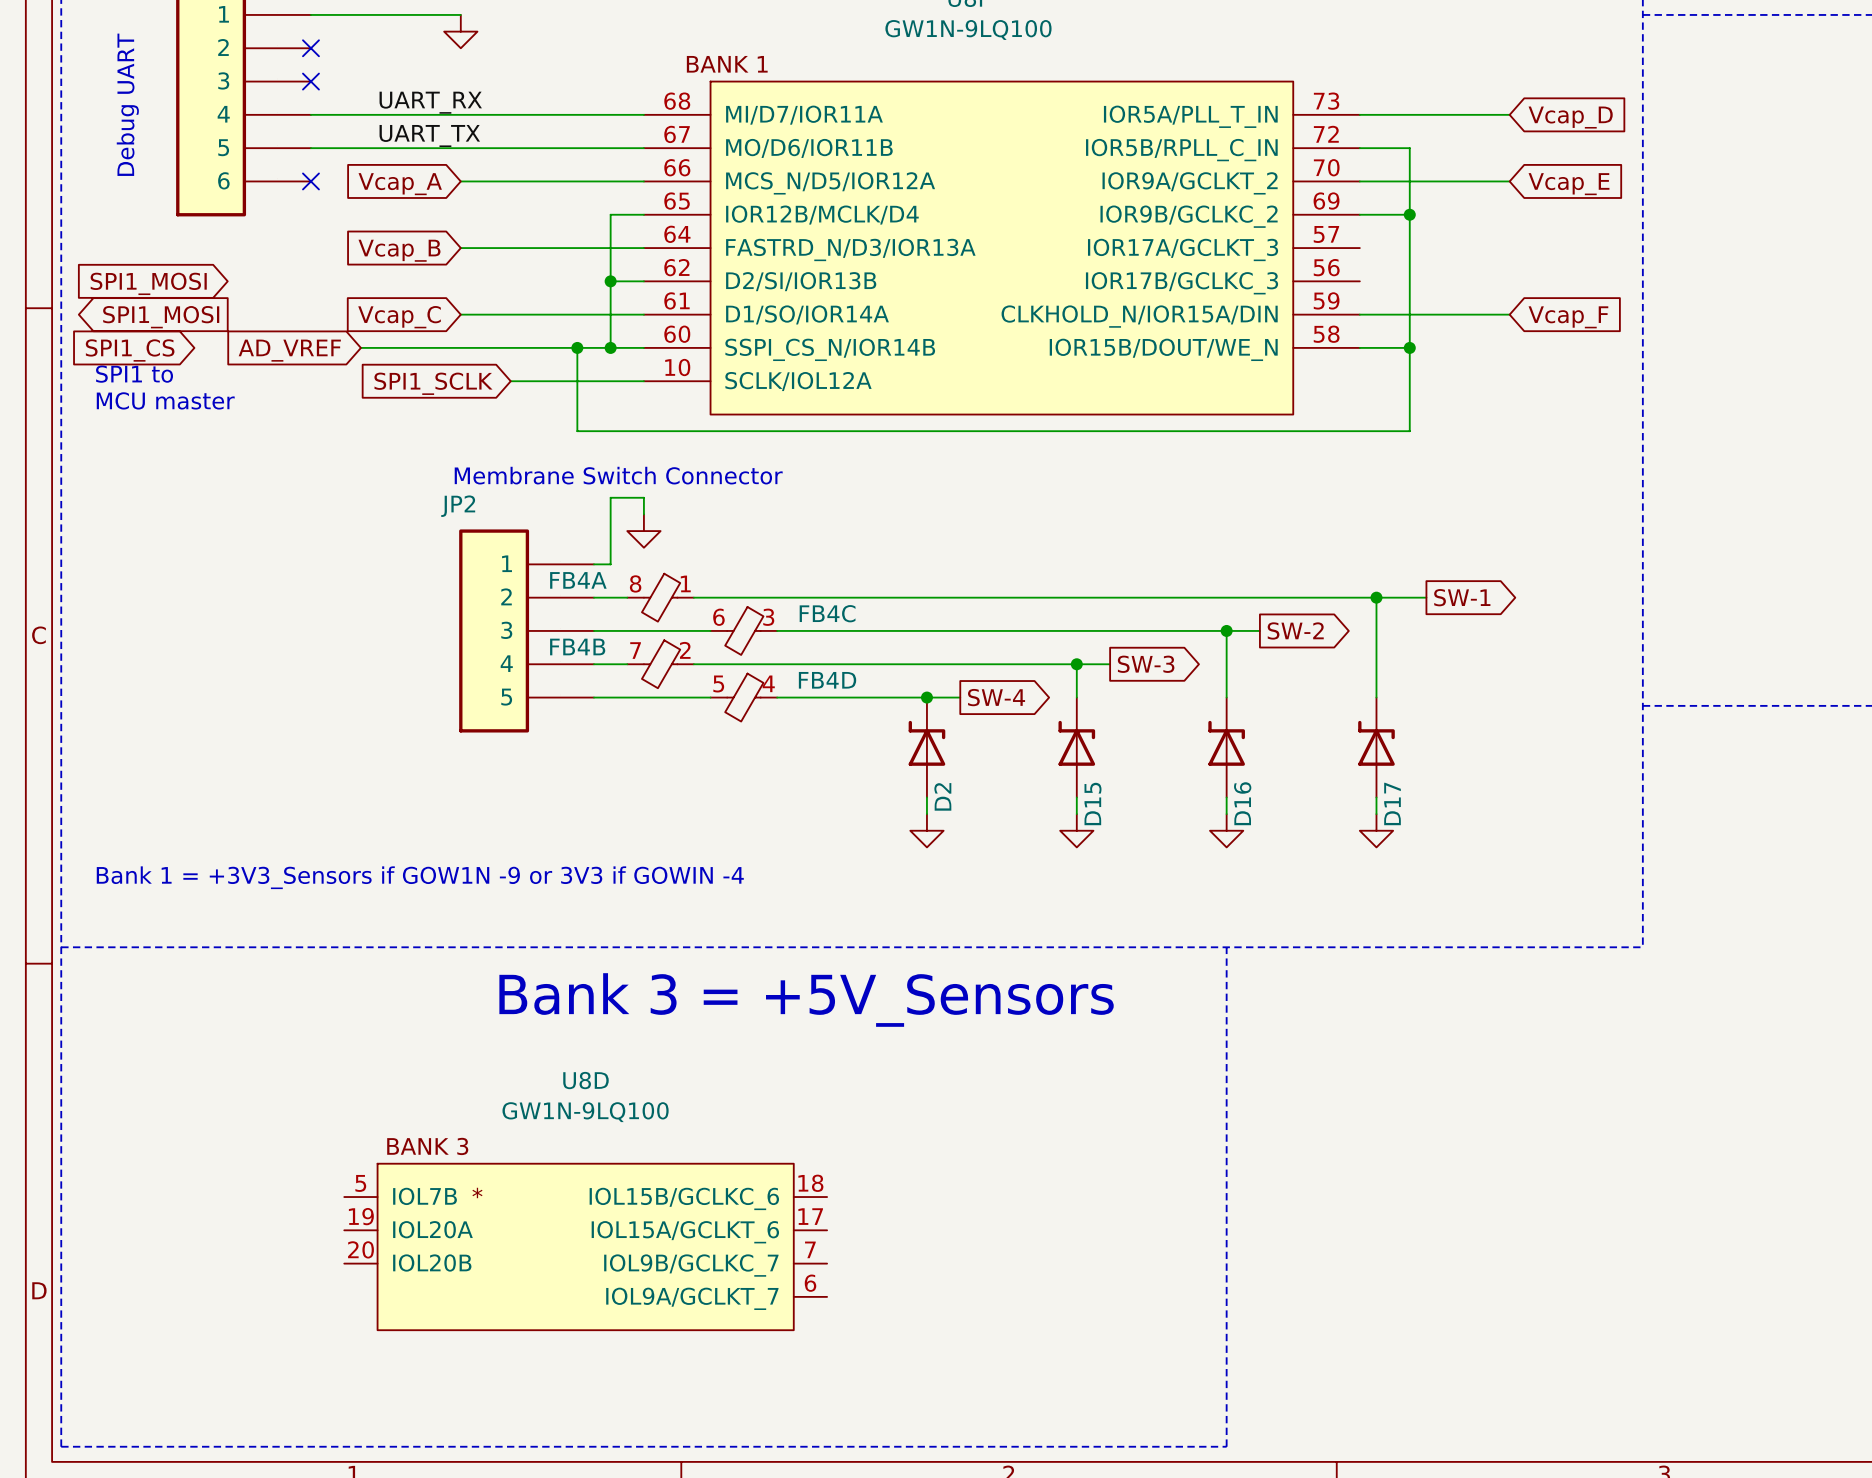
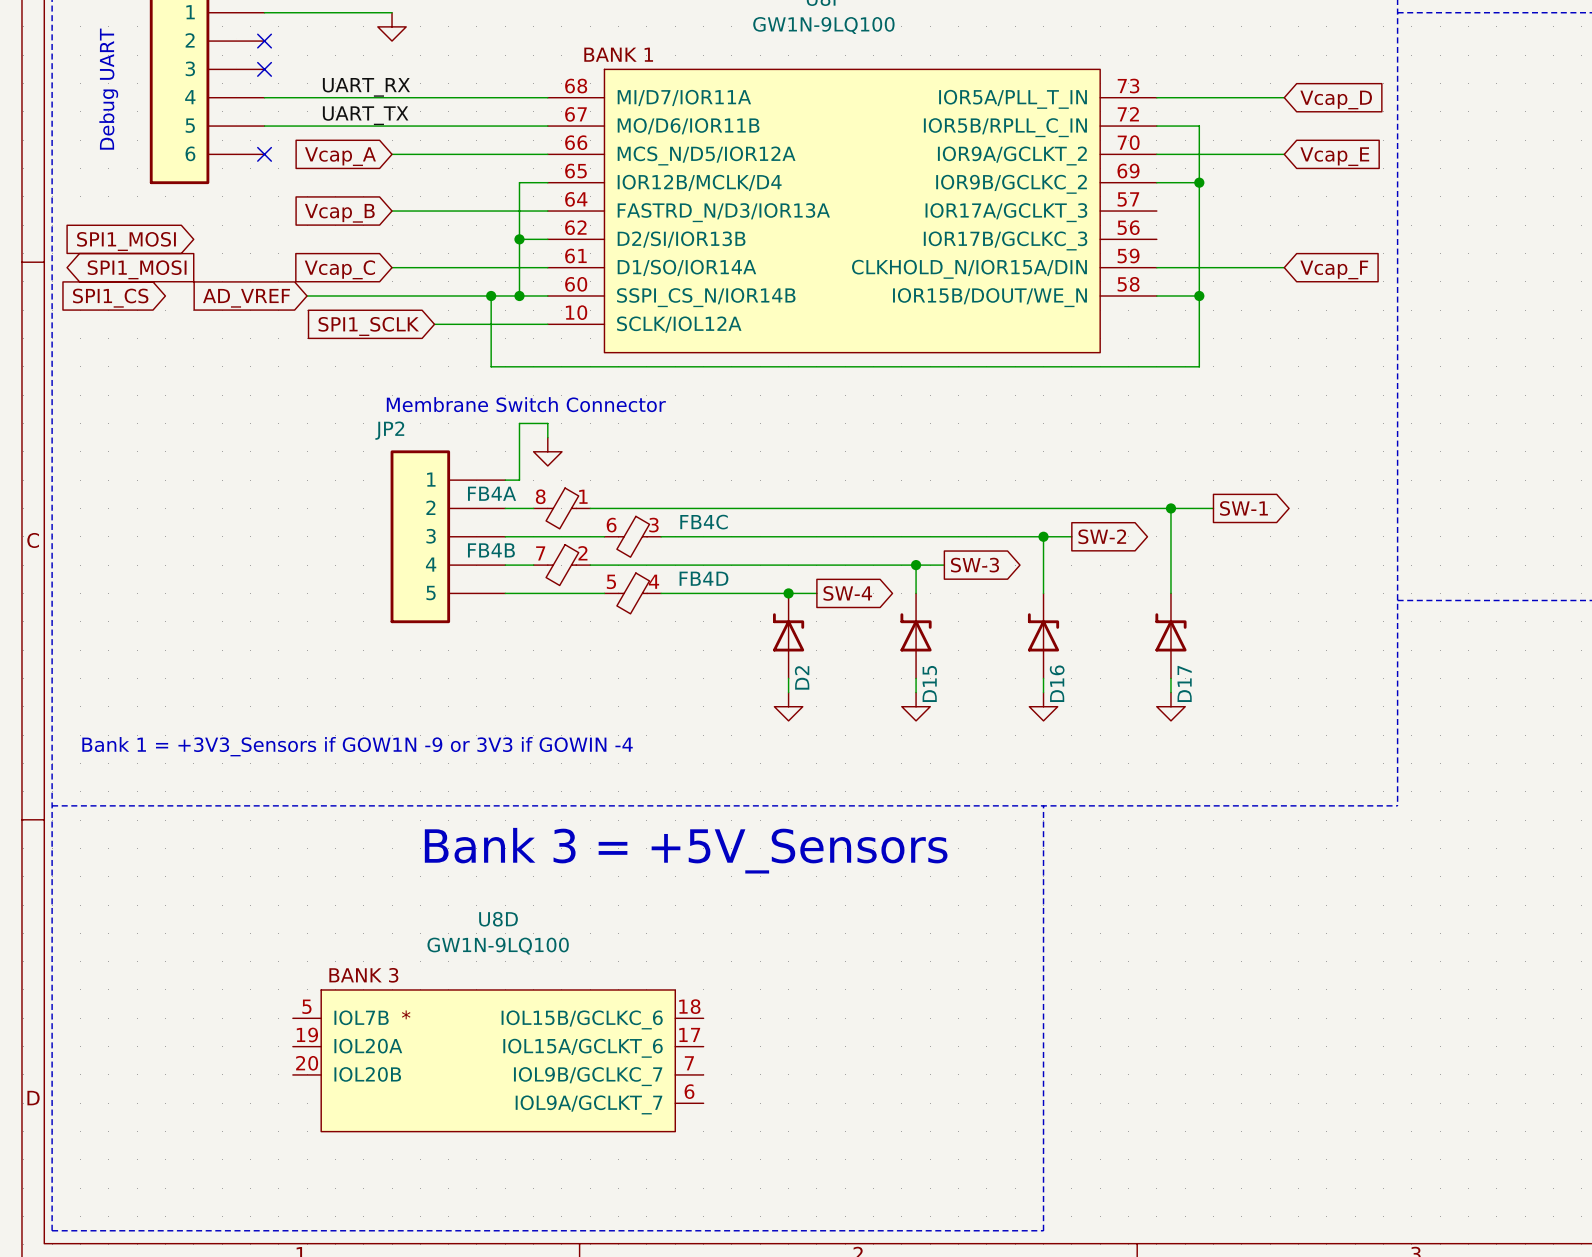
text: SPI1 to (134, 374) -> none
text: MCU master (165, 400) -> none

